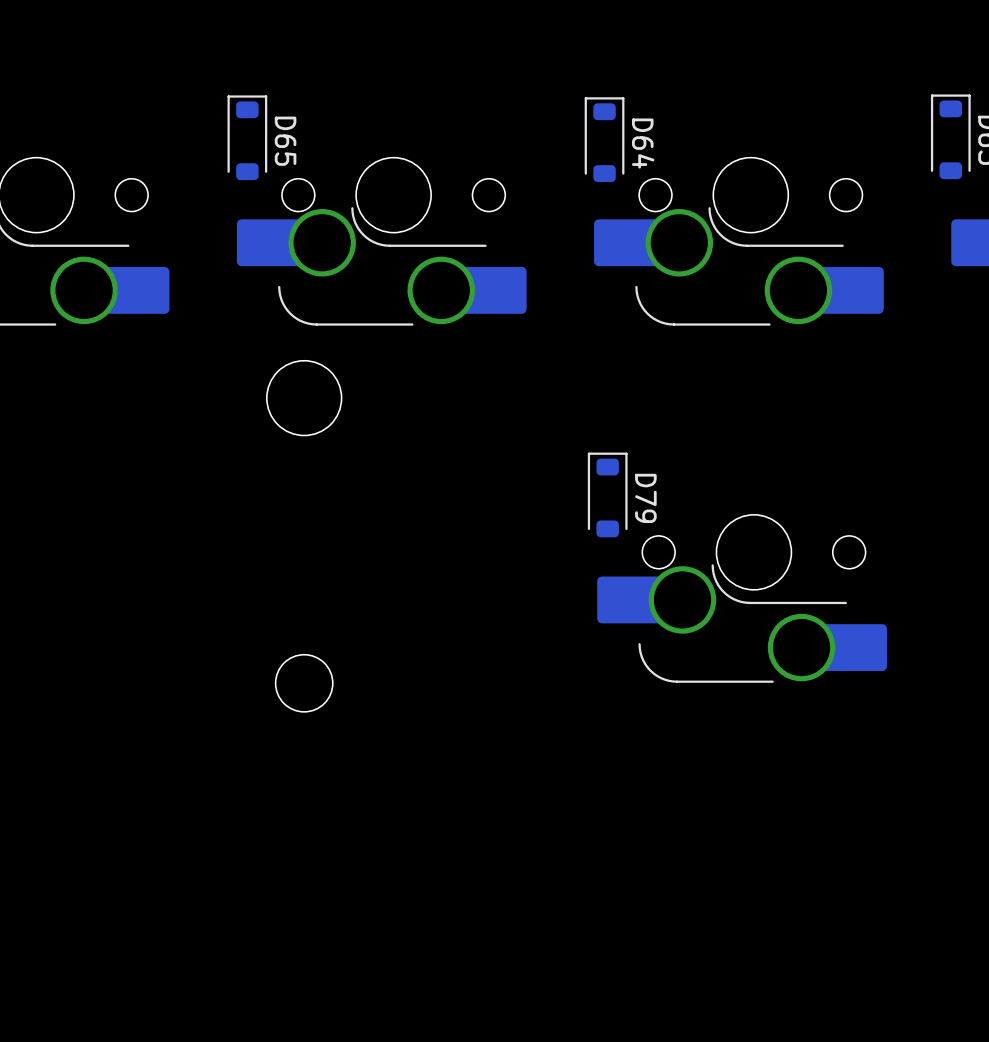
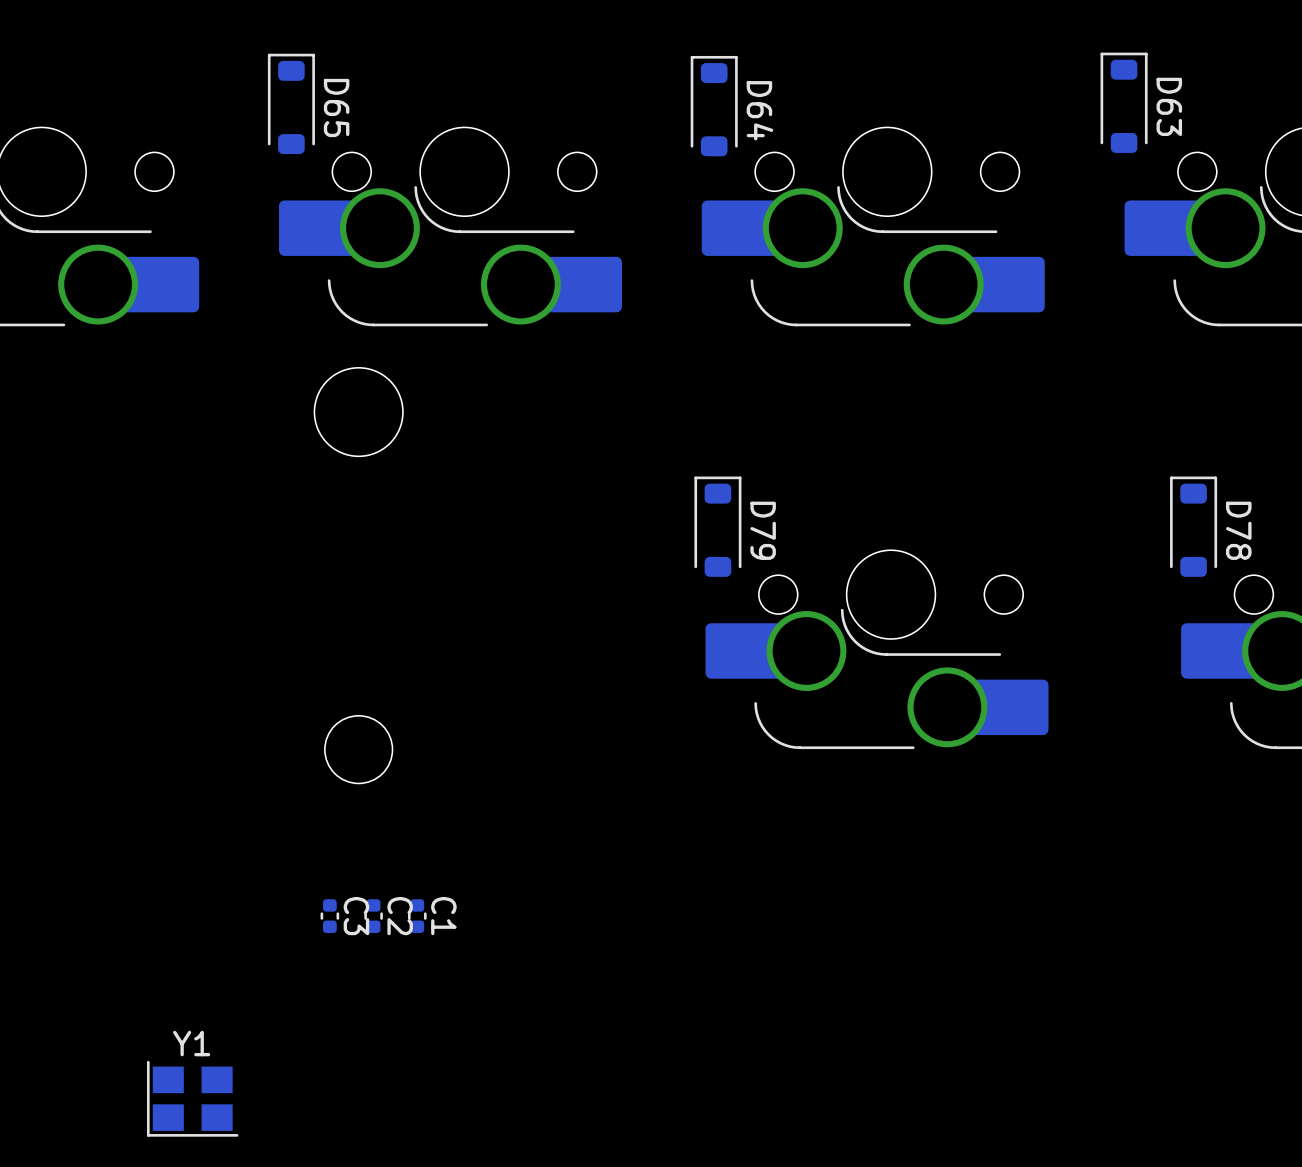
C3: none -> (329, 916)
C2: none -> (373, 916)
C1: none -> (417, 916)
Y1: none -> (192, 1098)

